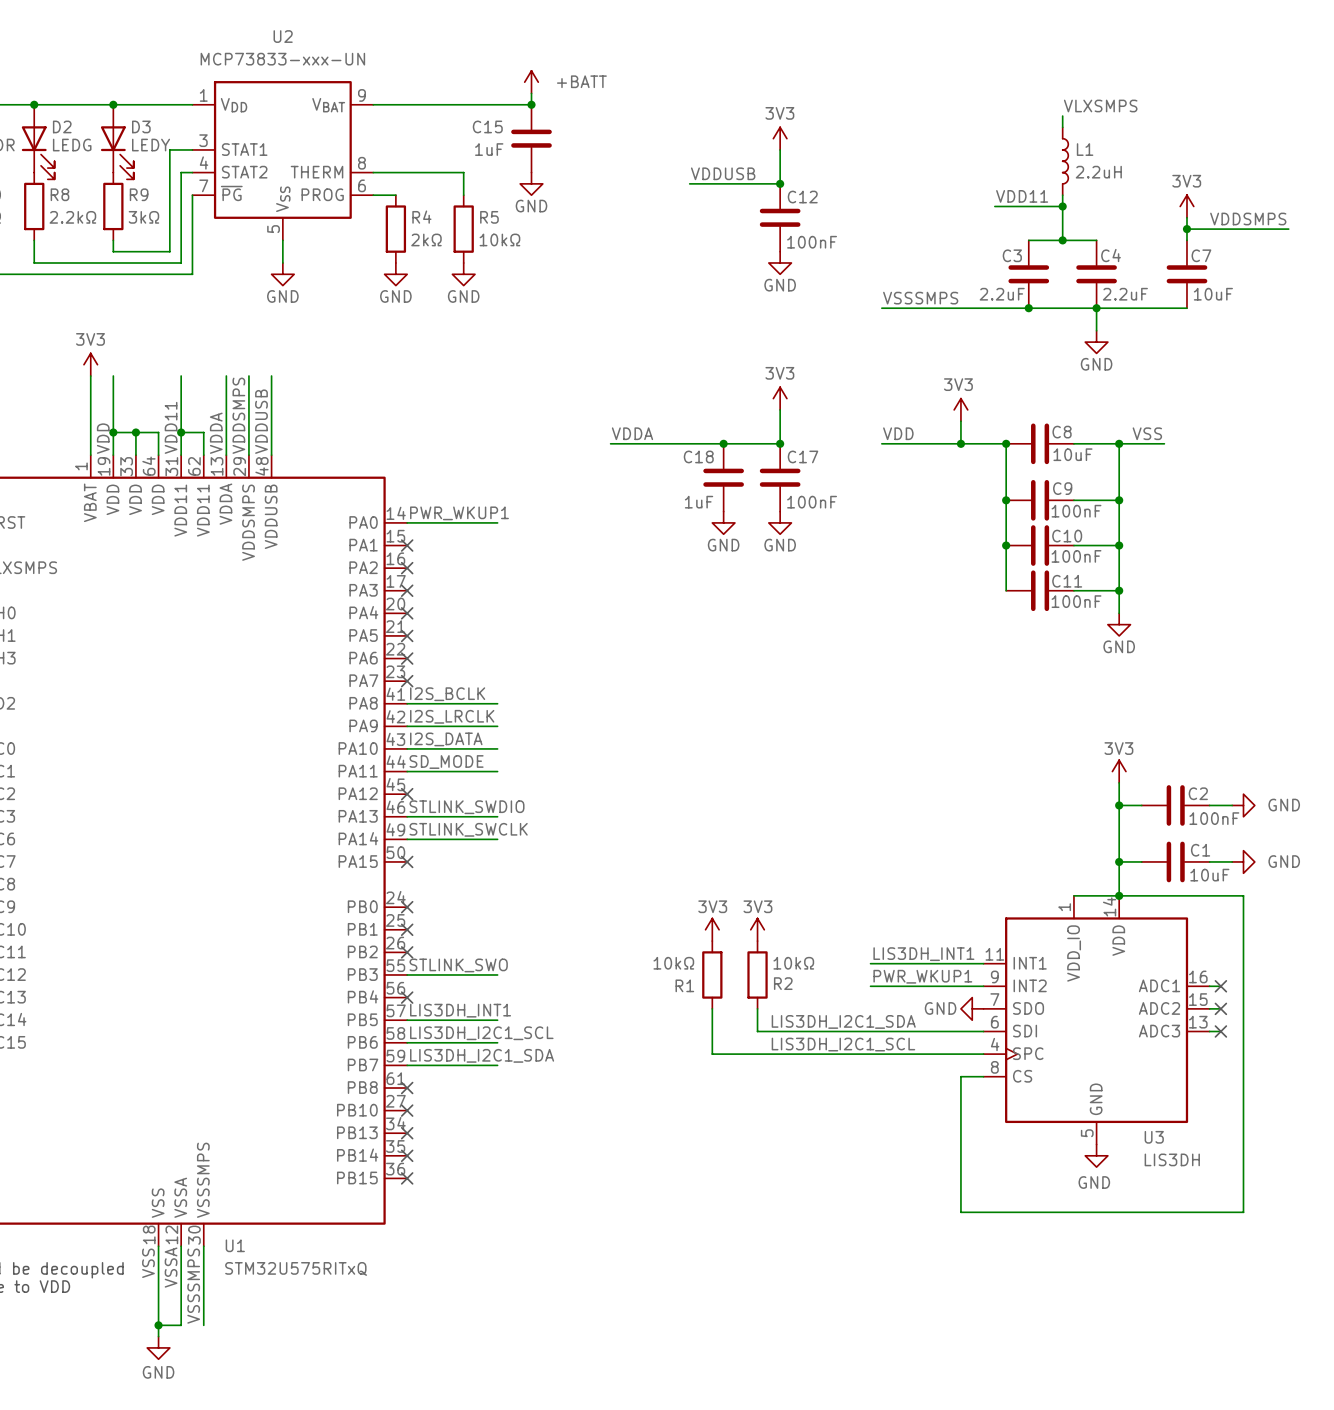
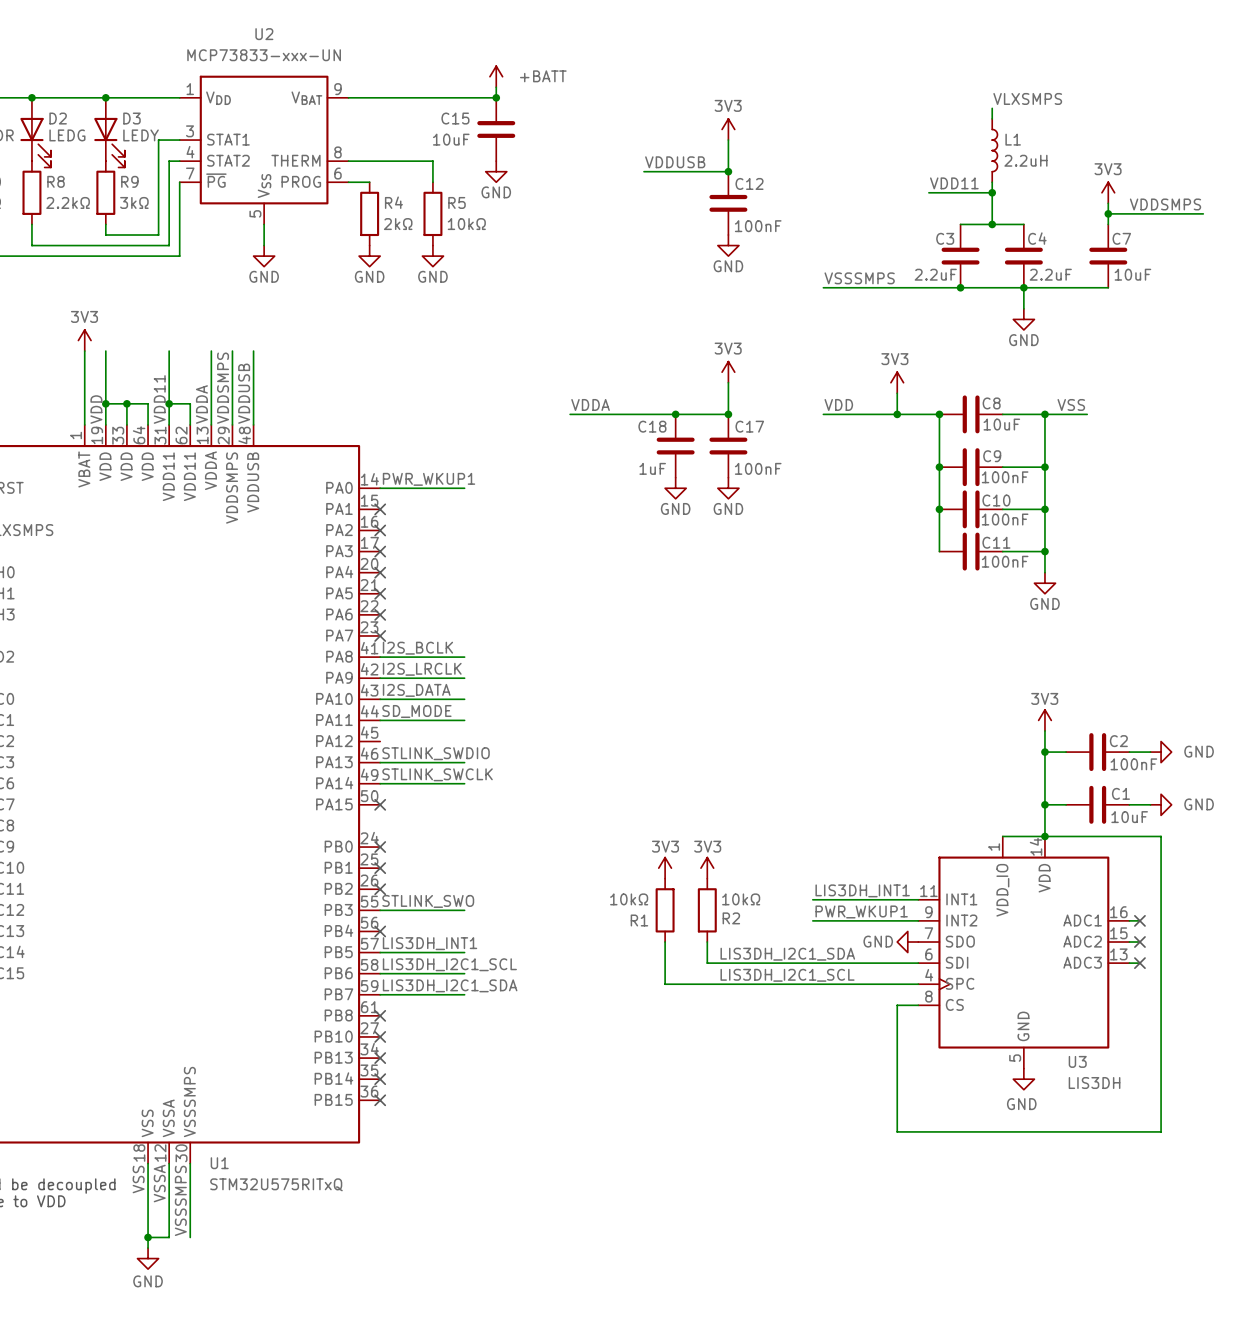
C15 value: 1uF (489, 149) -> 10uF (451, 139)
no-connect mark: (407, 794) -> none

